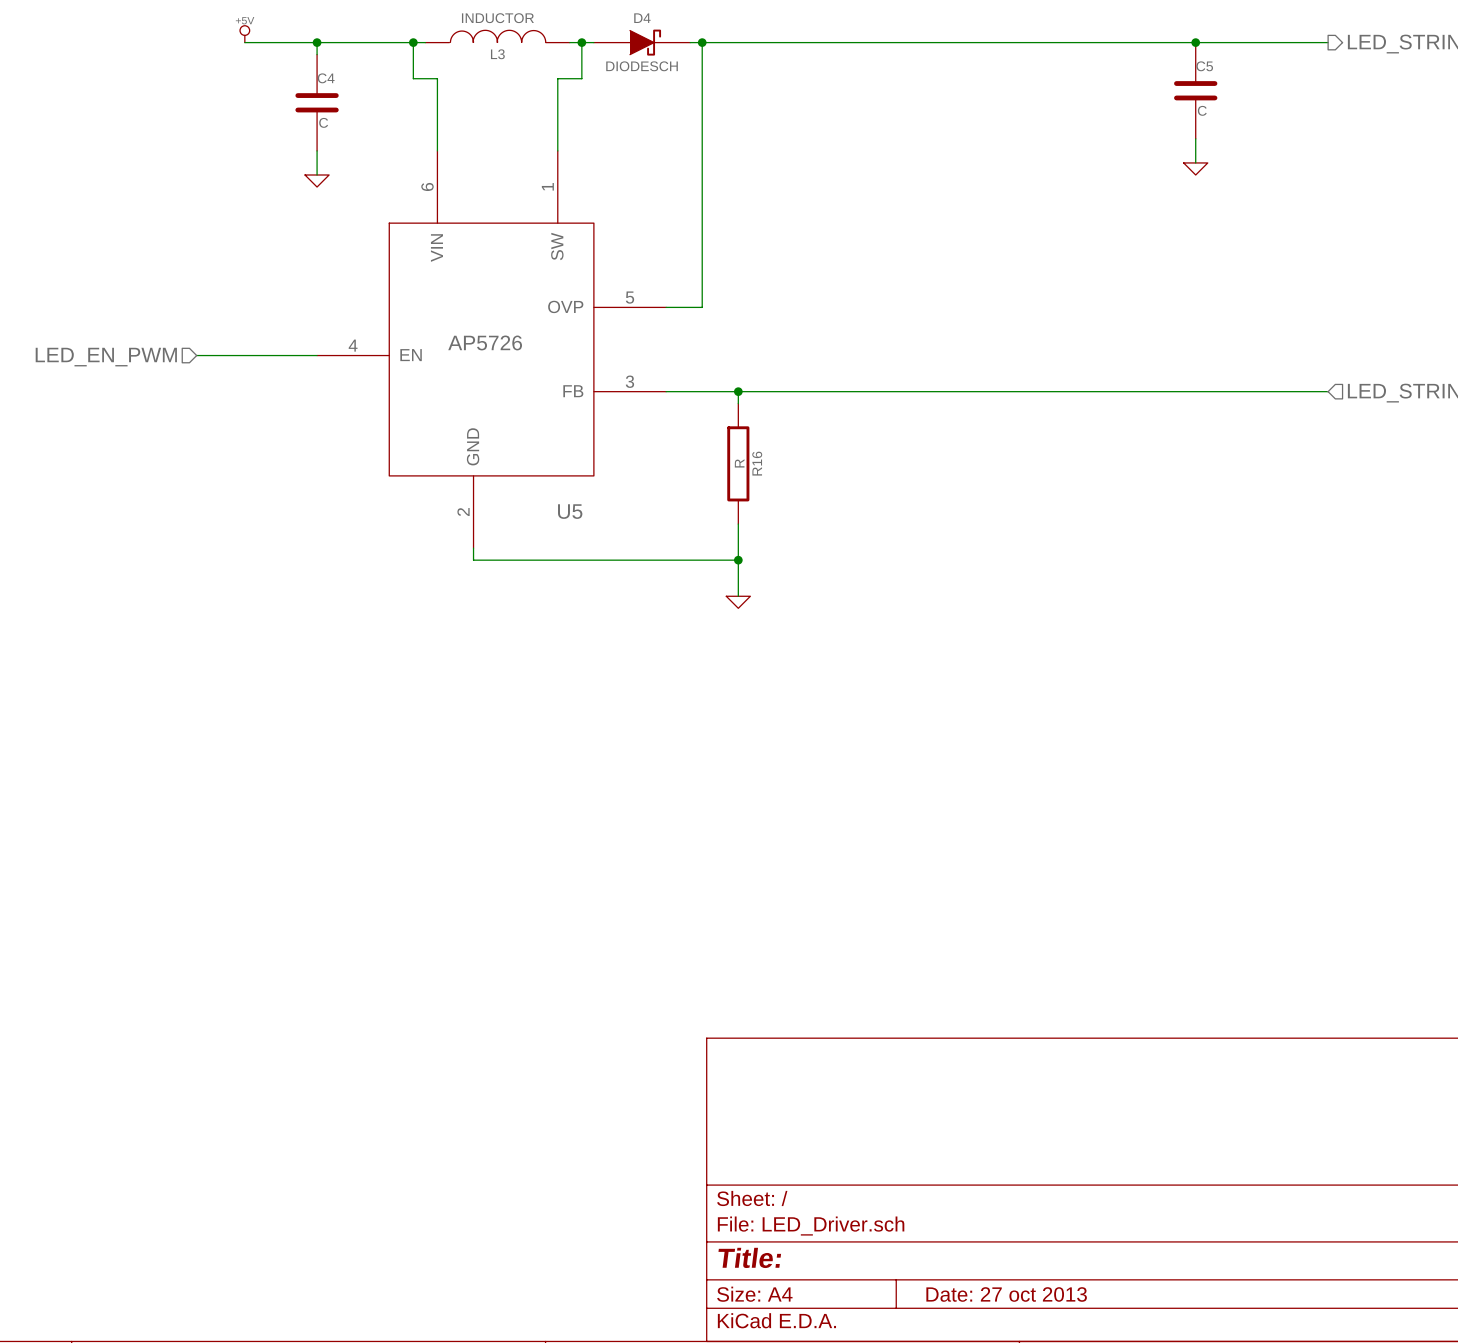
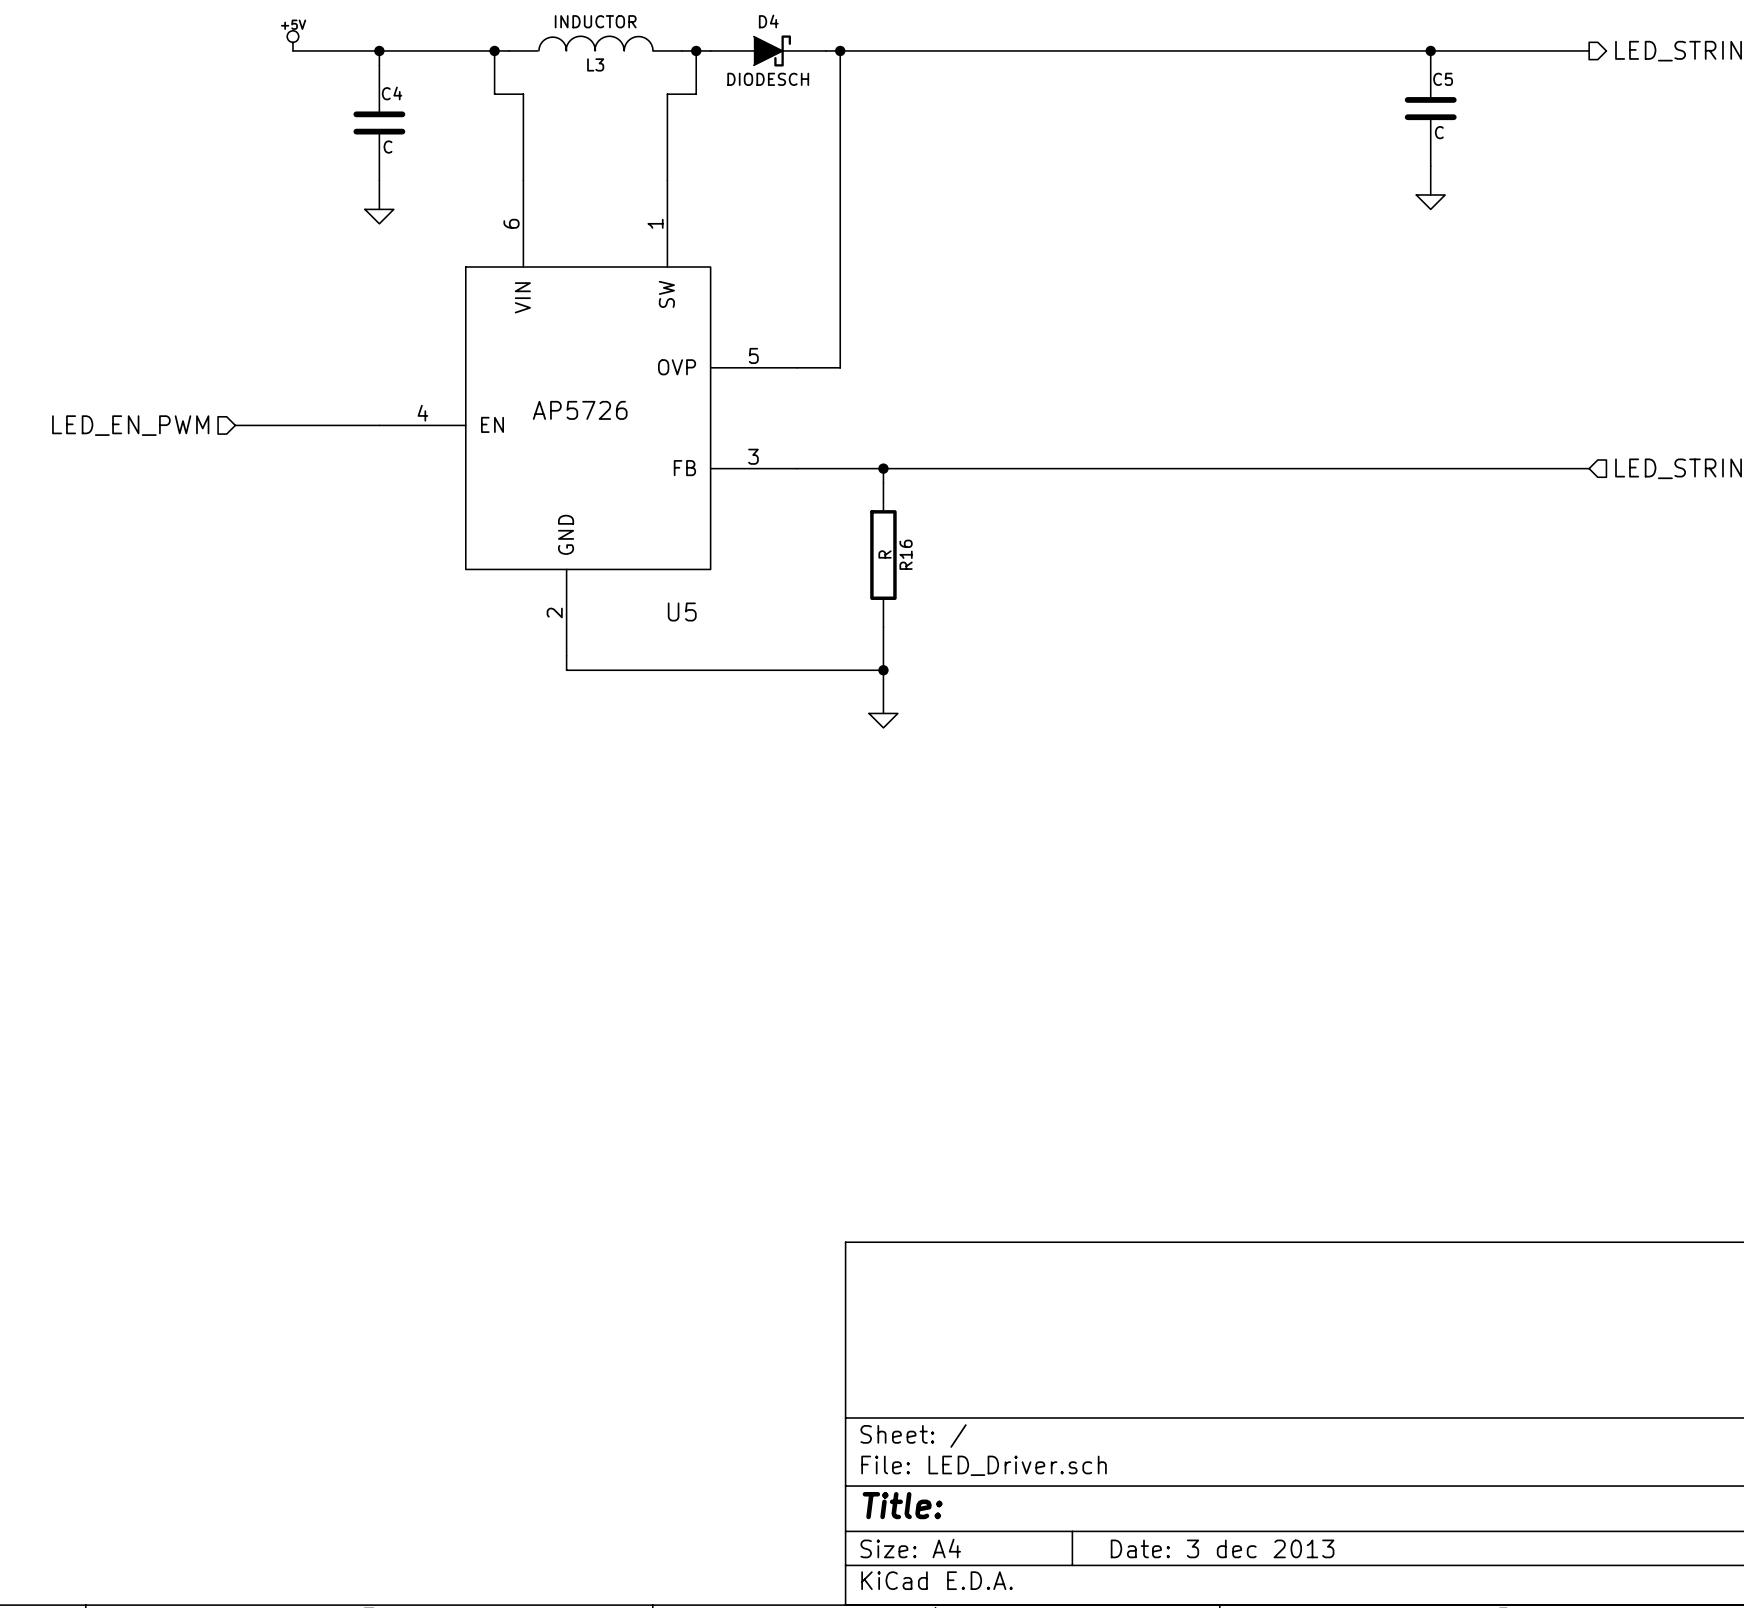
title block: Date: 27 oct 2013 (1006, 1294) -> Date: 3 dec 2013 (1222, 1548)

